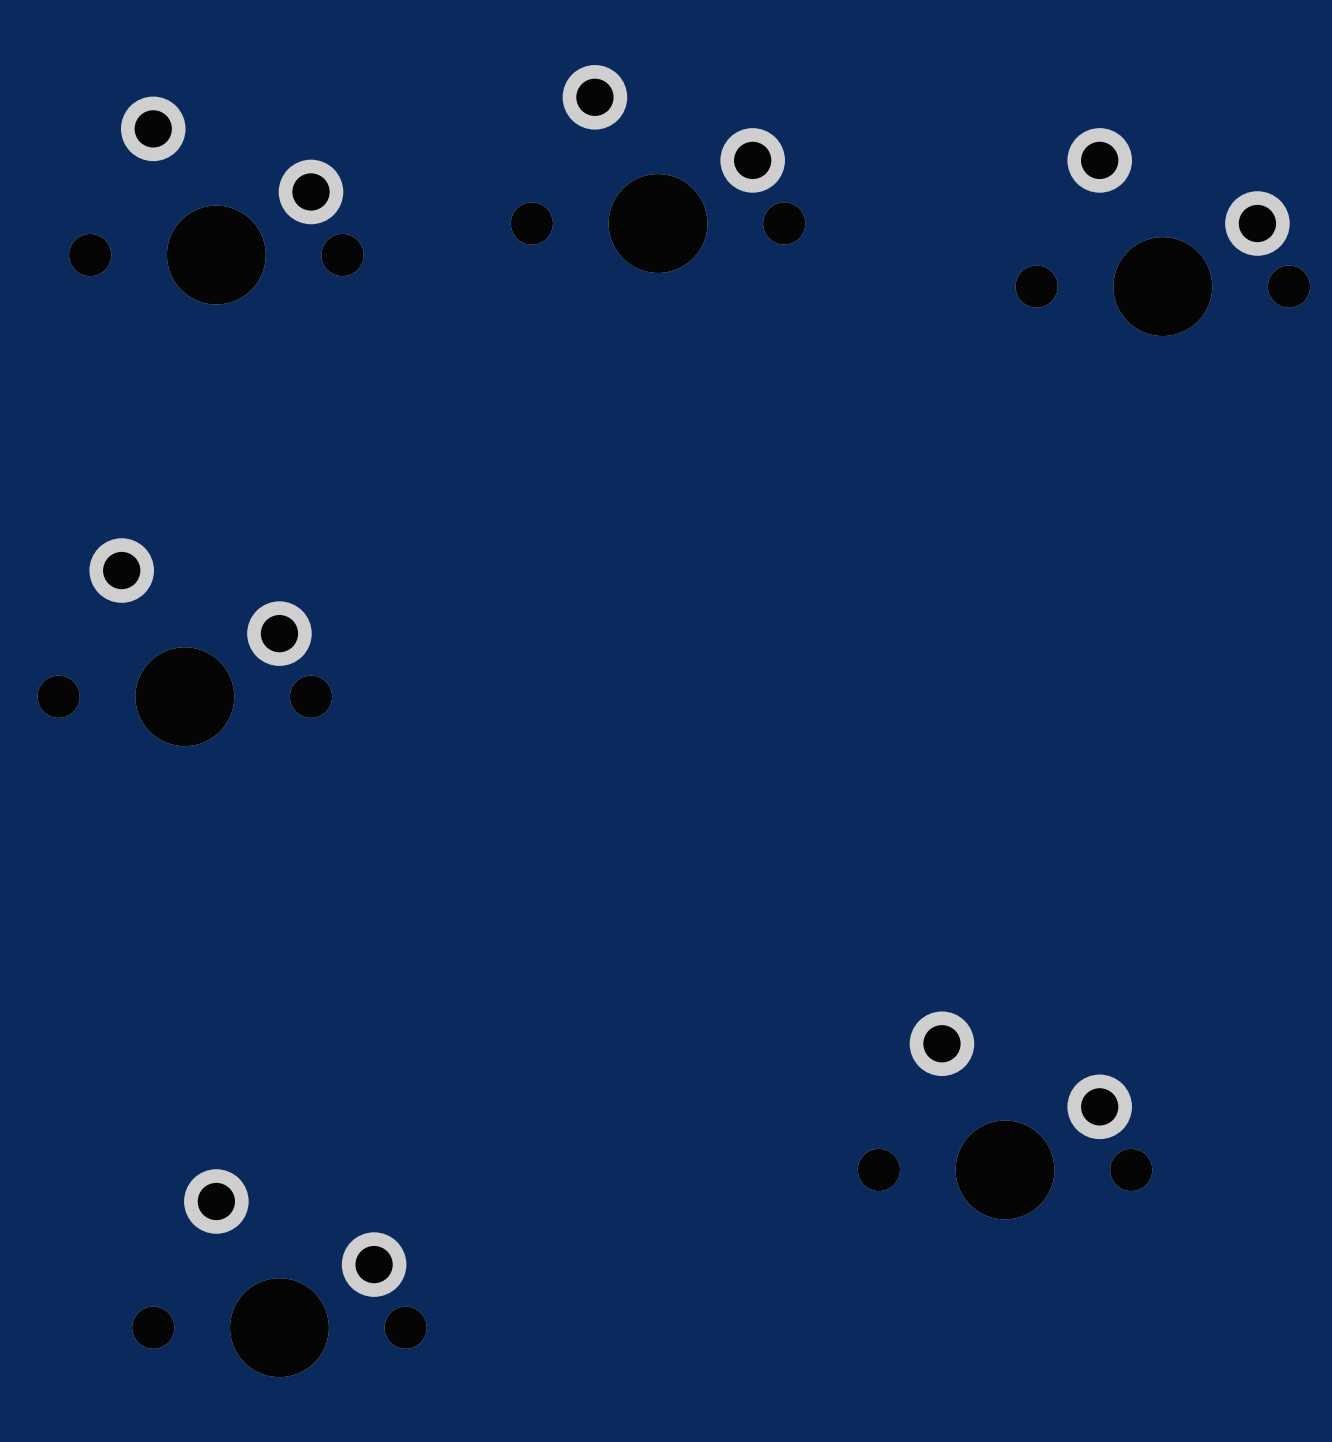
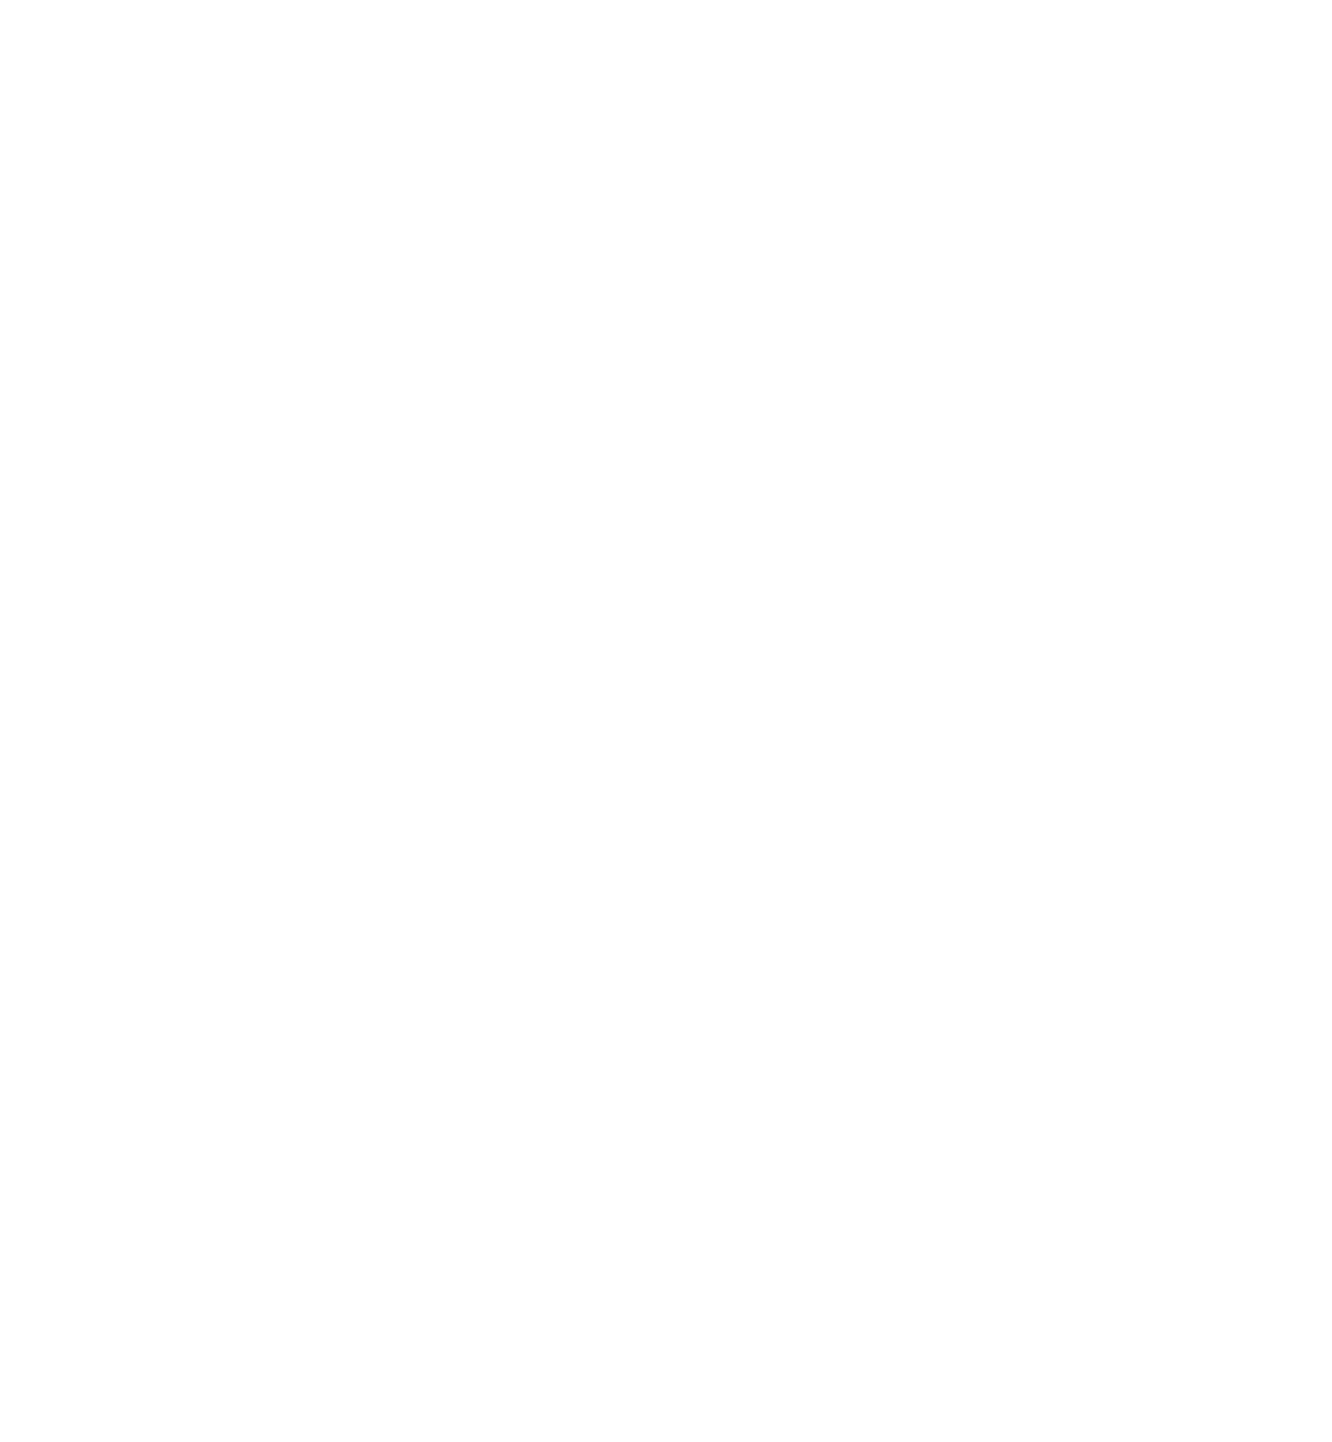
part: (658, 168) -> none
part: (216, 200) -> none
part: (1162, 232) -> none
part: (184, 642) -> none
part: (1005, 1115) -> none
part: (279, 1273) -> none

